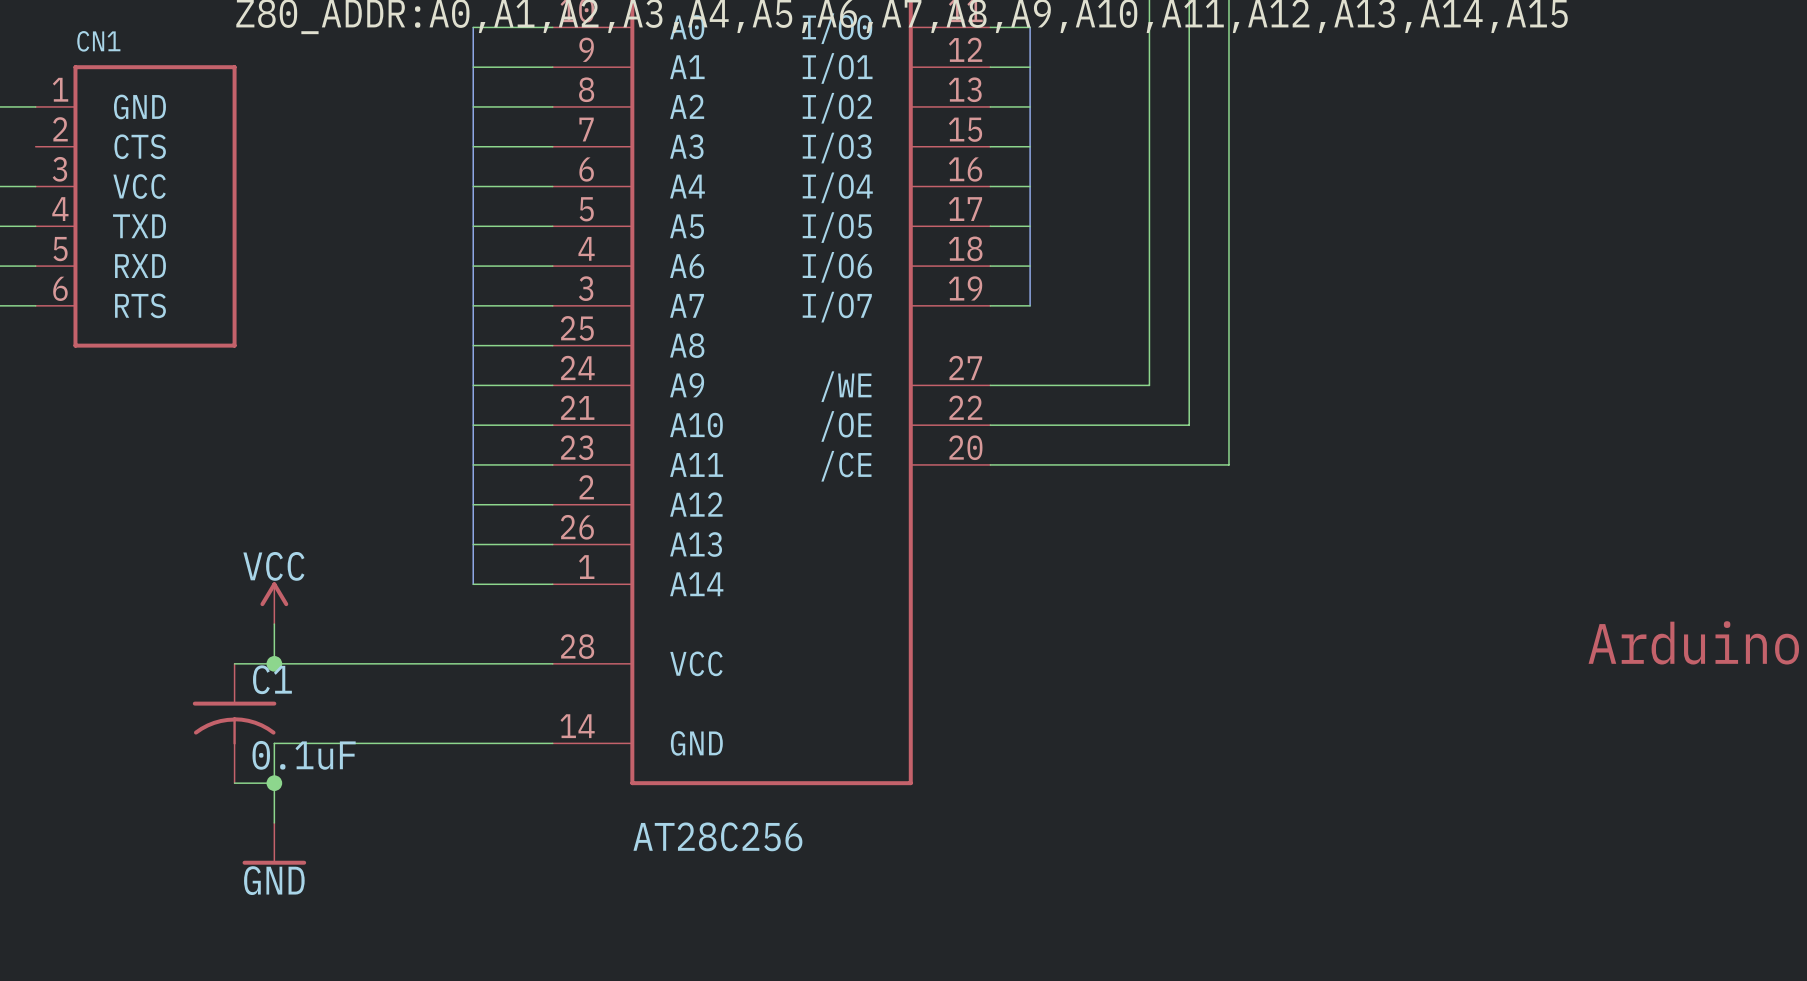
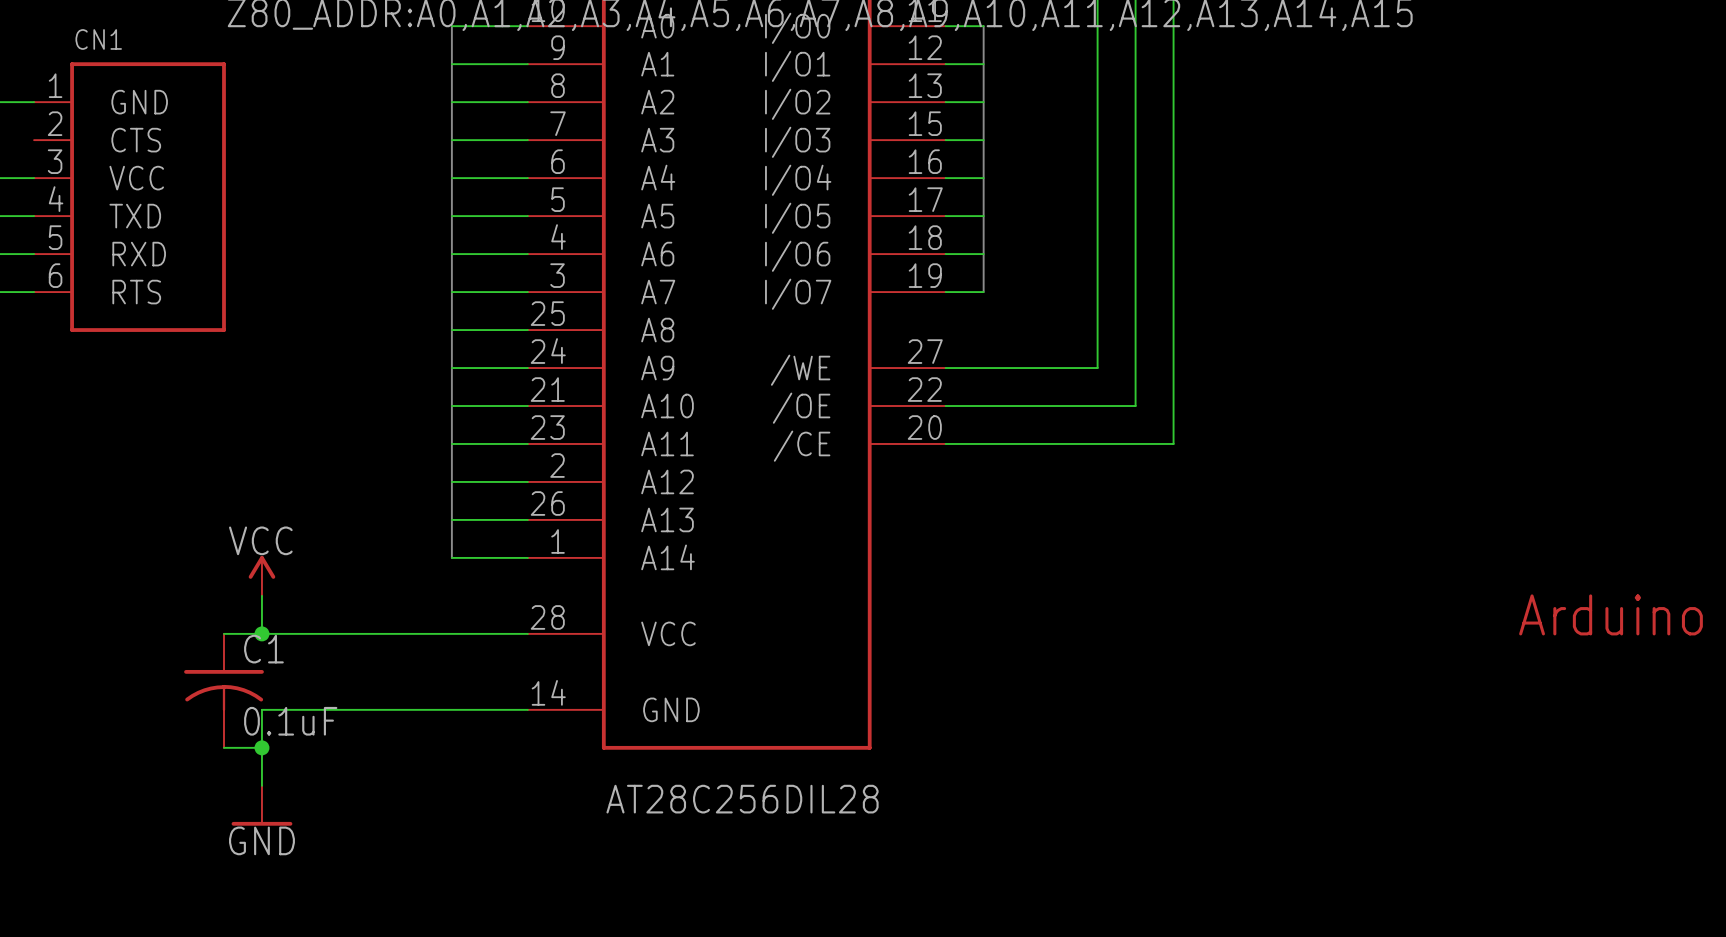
part value: AT28C256 (717, 836) -> AT28C256DIL28 (742, 799)

